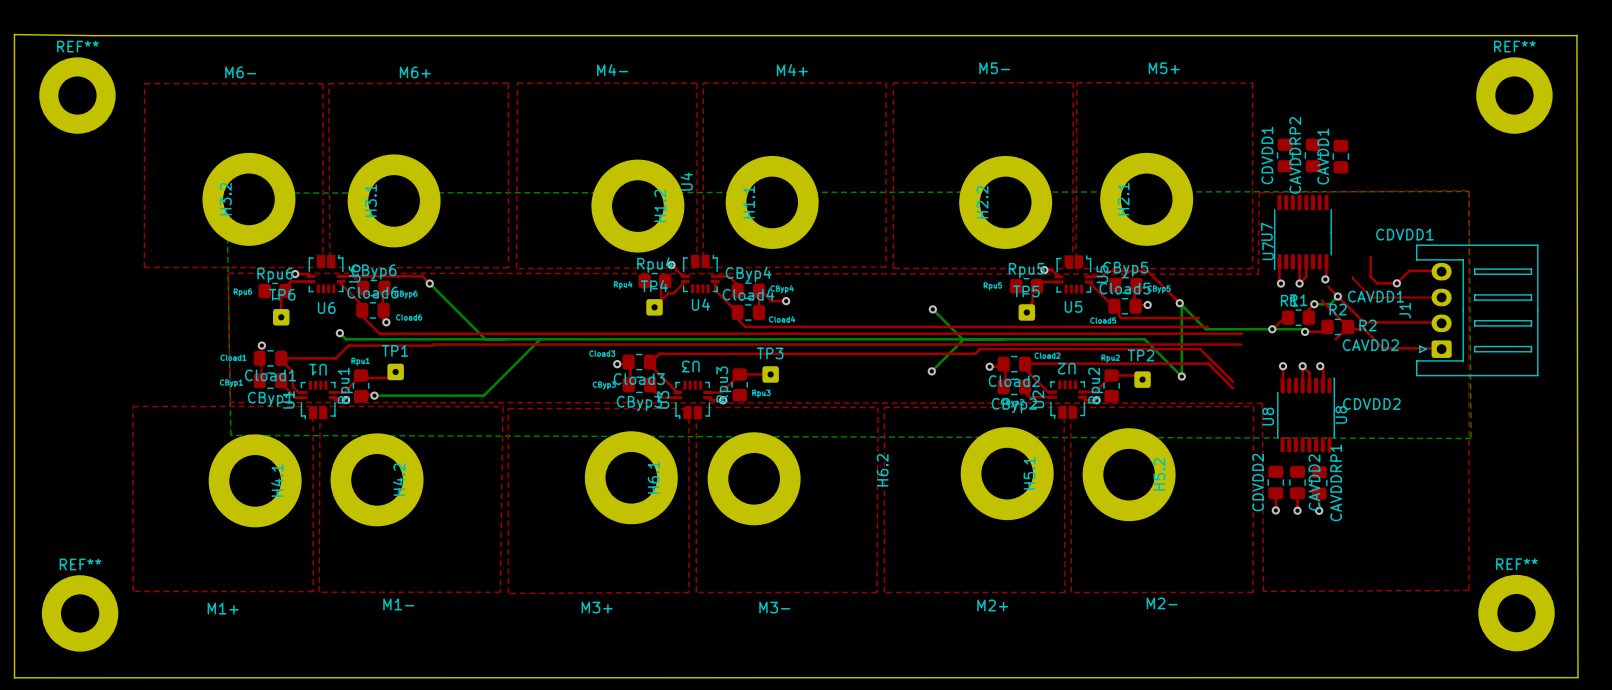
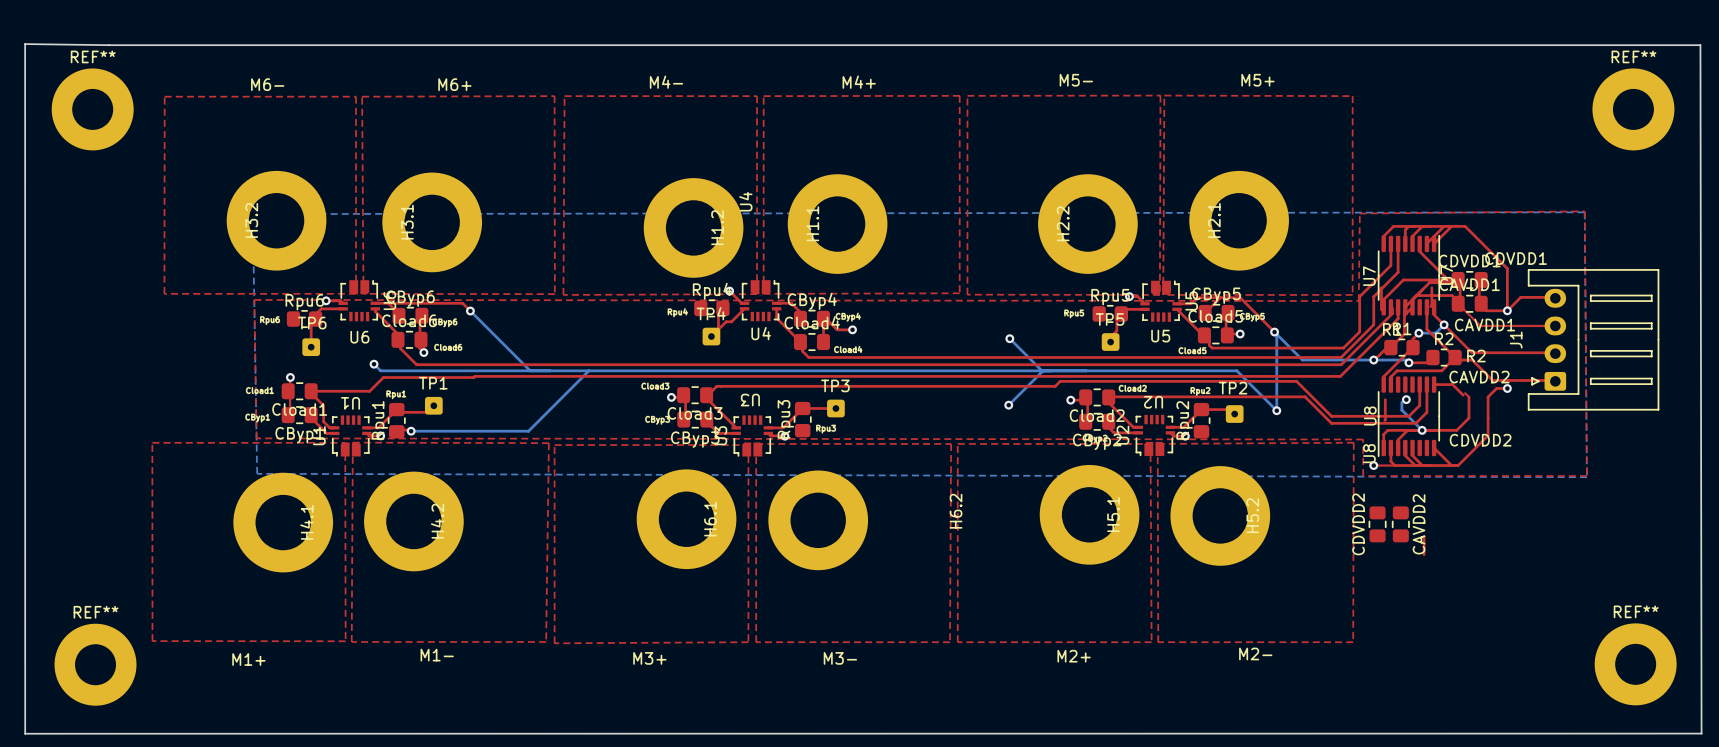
CDVDD1 rotation: 0° (1285, 155) -> 90° clockwise (1469, 280)
CDVDD1 position: (1285, 155) -> (1469, 280)
CAVDDRP2: (1313, 155) -> none
CAVDD1 rotation: 0° (1340, 156) -> 90° clockwise (1469, 303)
CAVDD1 position: (1340, 156) -> (1469, 303)
top zone outline: (1468, 190) (1468, 590) (1263, 591) (1262, 403) -> (1584, 211) (1586, 476) (1363, 476) (1363, 439)
top track: none -> (1408, 226) (1405, 229) (1405, 243)
top track: none -> (1422, 226) (1412, 236) (1412, 243)
top track: none -> (1444, 226) (1426, 243)
top track: none -> (1451, 226) (1434, 243)
top track: none -> (1383, 243) (1383, 236) (1393, 226) (1465, 226) (1507, 268) (1507, 310)
top track: none -> (1390, 243) (1390, 265) (1359, 296) (1359, 331) (1343, 348) (1295, 348)
top track: none -> (1398, 243) (1398, 272) (1373, 296) (1373, 324)
top track: none -> (1419, 243) (1419, 251) (1450, 282)
U7 rotation: 0° (1302, 232) -> 180° (1408, 275)
top track: none -> (1458, 280) (1403, 280) (1383, 299) (1383, 307)
top track: (1299, 261) (1299, 283) (1306, 276) (1306, 261) -> none
top track: none -> (1416, 295) (1451, 295) (1460, 303) (1460, 282) (1429, 282) (1405, 306) (1405, 307)
via: (1325, 279) -> none
top track: none -> (1390, 307) (1392, 313) (1341, 364)
top track: none -> (1398, 307) (1398, 318) (1340, 376)
top track: none -> (1412, 307) (1404, 315) (1404, 333) (1390, 347)
top track: none -> (1426, 307) (1426, 329)
via: (1280, 283) -> none
via: (1299, 283) -> none
top track: none -> (1373, 324) (1341, 357) (1304, 357)
top track: none -> (1412, 347) (1383, 376) (1383, 384)
top track: none -> (1441, 370) (1397, 370) (1390, 376) (1390, 384)
top track: none -> (1419, 384) (1419, 405) (1408, 416) (1331, 416)
top track: none -> (1426, 384) (1426, 412) (1415, 423) (1331, 423)
top track: none -> (1434, 384) (1452, 384) (1463, 395)
top track: none -> (1507, 388) (1496, 388) (1488, 397) (1488, 435) (1458, 465) (1394, 465)
via: none -> (1507, 388)
top track: none -> (1465, 393) (1468, 397) (1468, 418) (1456, 430) (1387, 430) (1383, 434) (1383, 448)
via: (1283, 366) -> none
top track: (1320, 366) (1323, 369) (1322, 385) -> none
via: (1320, 366) -> none
bottom track: none -> (1401, 402) (1401, 410) (1422, 430)
top track: (1302, 385) (1302, 366) (1309, 372) (1309, 385) -> none
top track: none -> (1407, 430) (1398, 439) (1398, 448)
via: none -> (1422, 430)
top track: none -> (1390, 448) (1390, 461) (1394, 465)
top track: none -> (1405, 448) (1405, 455) (1415, 465)
top track: none -> (1412, 448) (1412, 455) (1422, 465)
top track: none -> (1434, 448) (1451, 465)
U8 rotation: 0° (1306, 414) -> 180° (1408, 416)
top track: none -> (1373, 465) (1394, 465)
via: none -> (1373, 465)
CAVDDRP1: (1319, 482) -> none
top track: (1275, 493) (1275, 510) -> none
top track: (1297, 493) (1297, 510) -> none
via: (1275, 510) -> none
via: (1297, 510) -> none
via: (1319, 510) -> none

